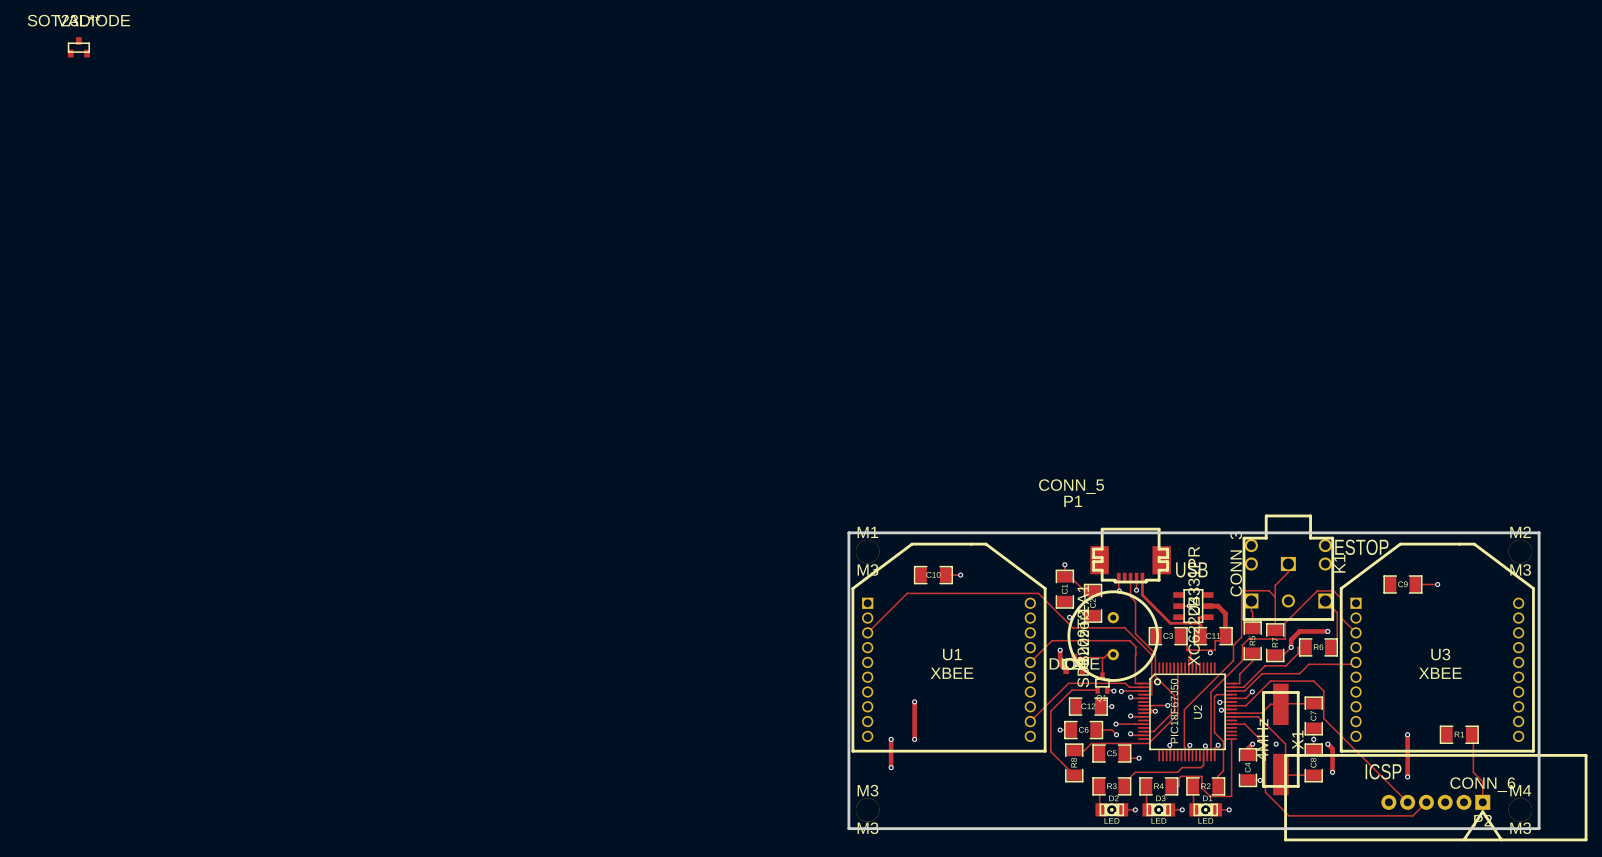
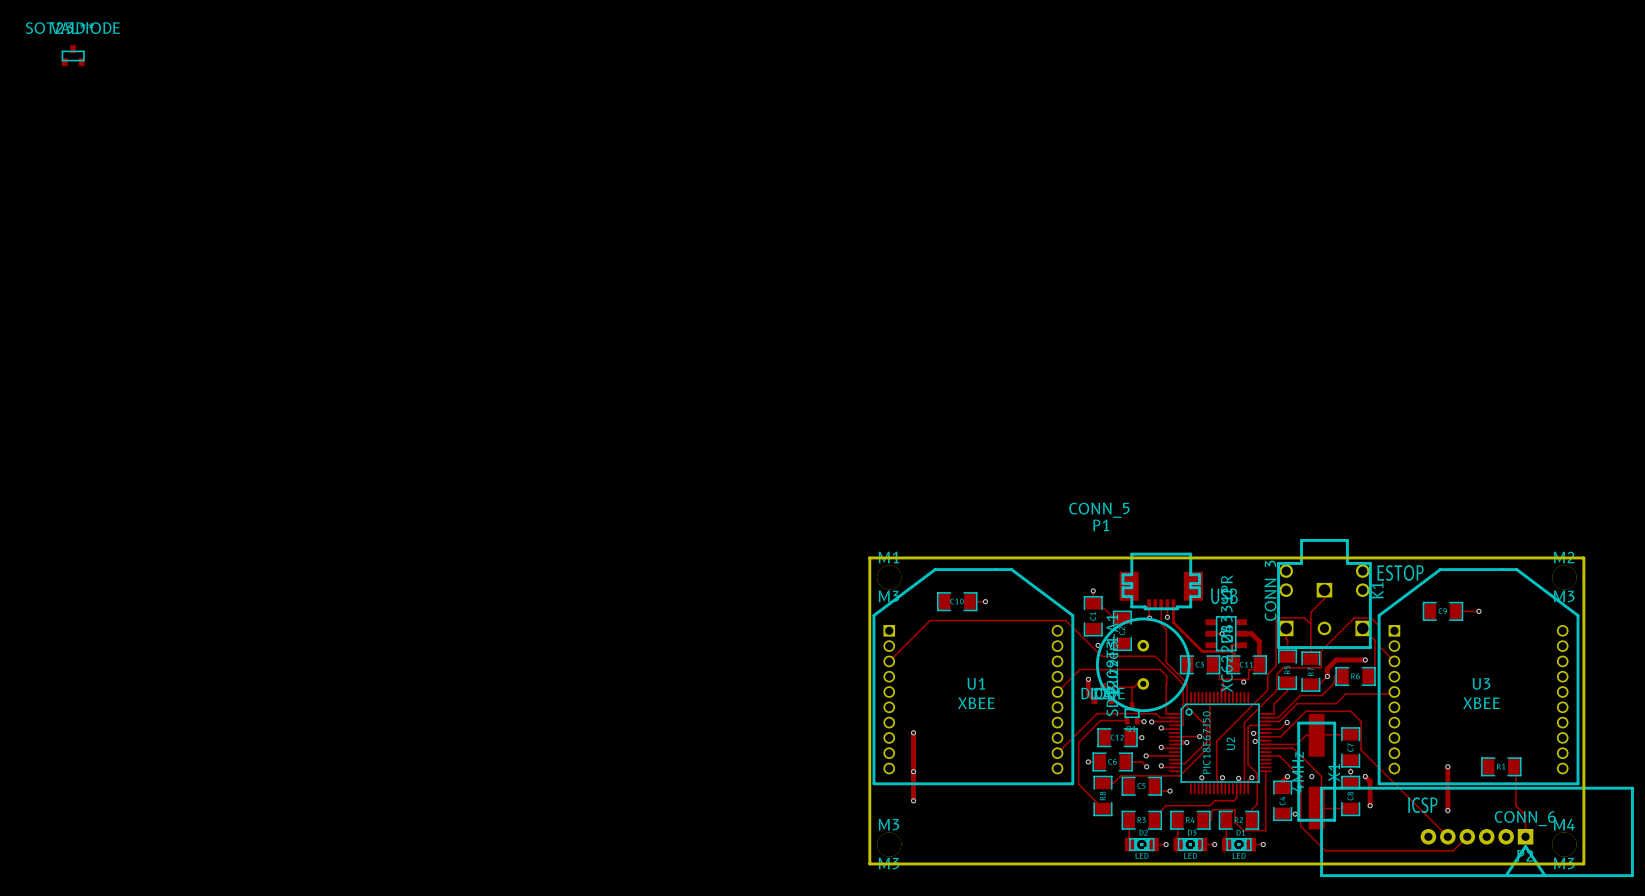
via: none -> (913, 732)
track: (914, 701) (914, 739) -> (913, 732) (913, 771)
via: (914, 701) -> none
via: (914, 739) -> none

